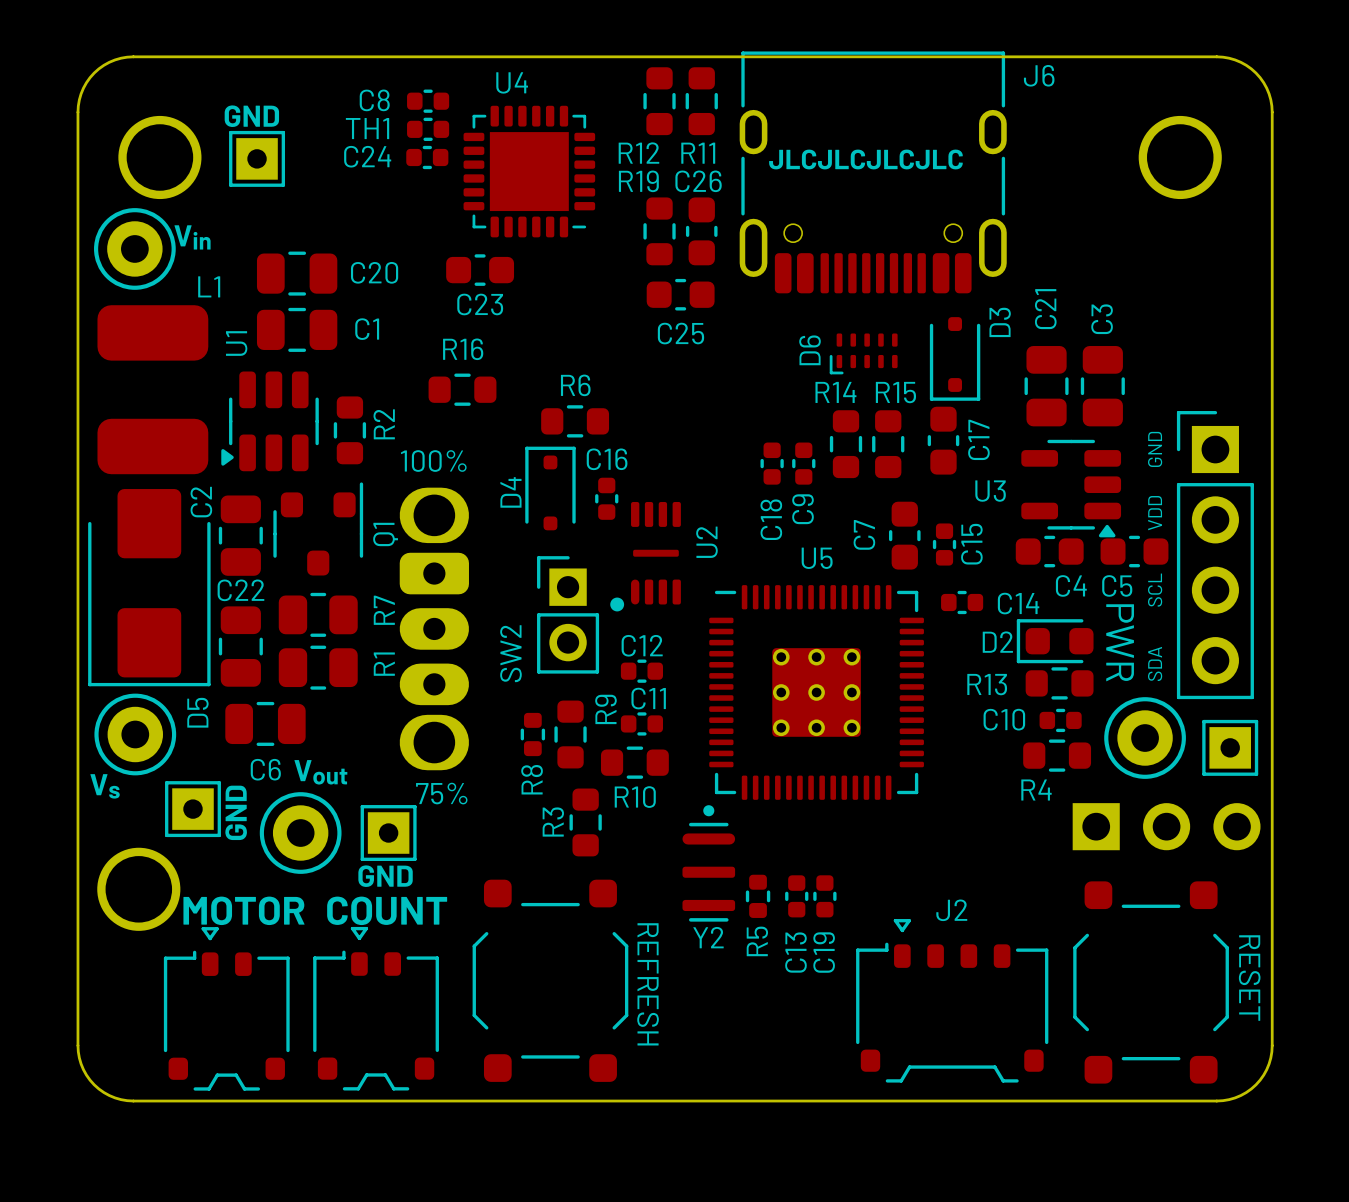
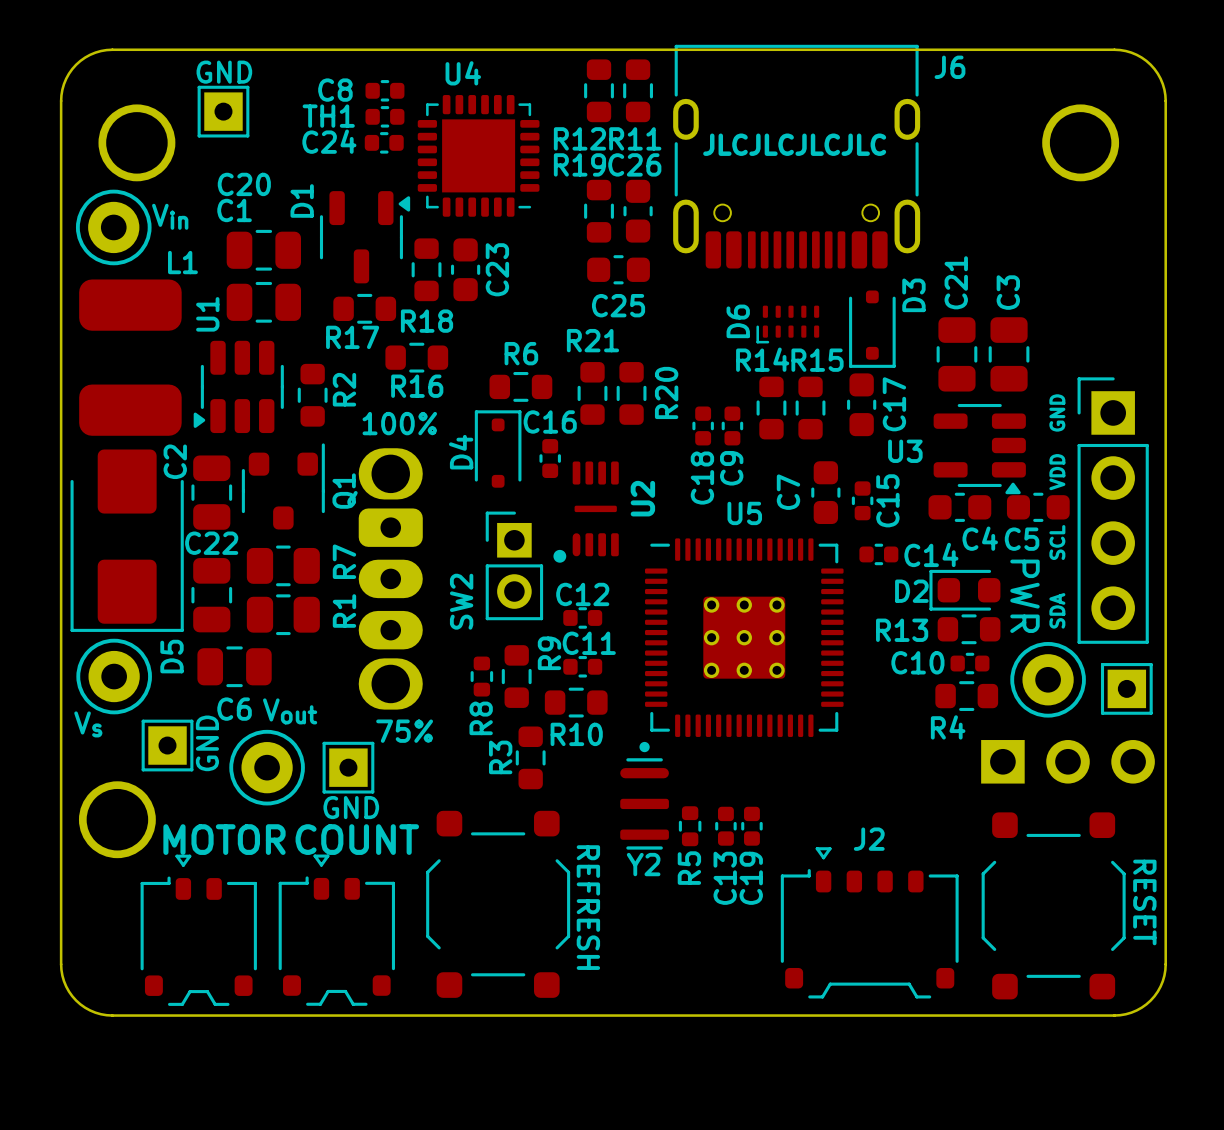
text position: GND (251, 116) -> GND (224, 72)
part position: (257, 158) -> (223, 111)
D1: none -> (365, 237)
C23 rotation: 0° (480, 270) -> 90° clockwise (465, 269)
C23 position: (480, 270) -> (465, 269)
C20 name position: C20 (374, 272) -> C20 (244, 184)
R18: none -> (426, 269)
C1 name position: C1 (367, 329) -> C1 (234, 210)
R17: none -> (364, 308)
R16 name position: R16 (463, 349) -> R16 (417, 386)
R21: none -> (592, 393)
R20: none -> (631, 393)

